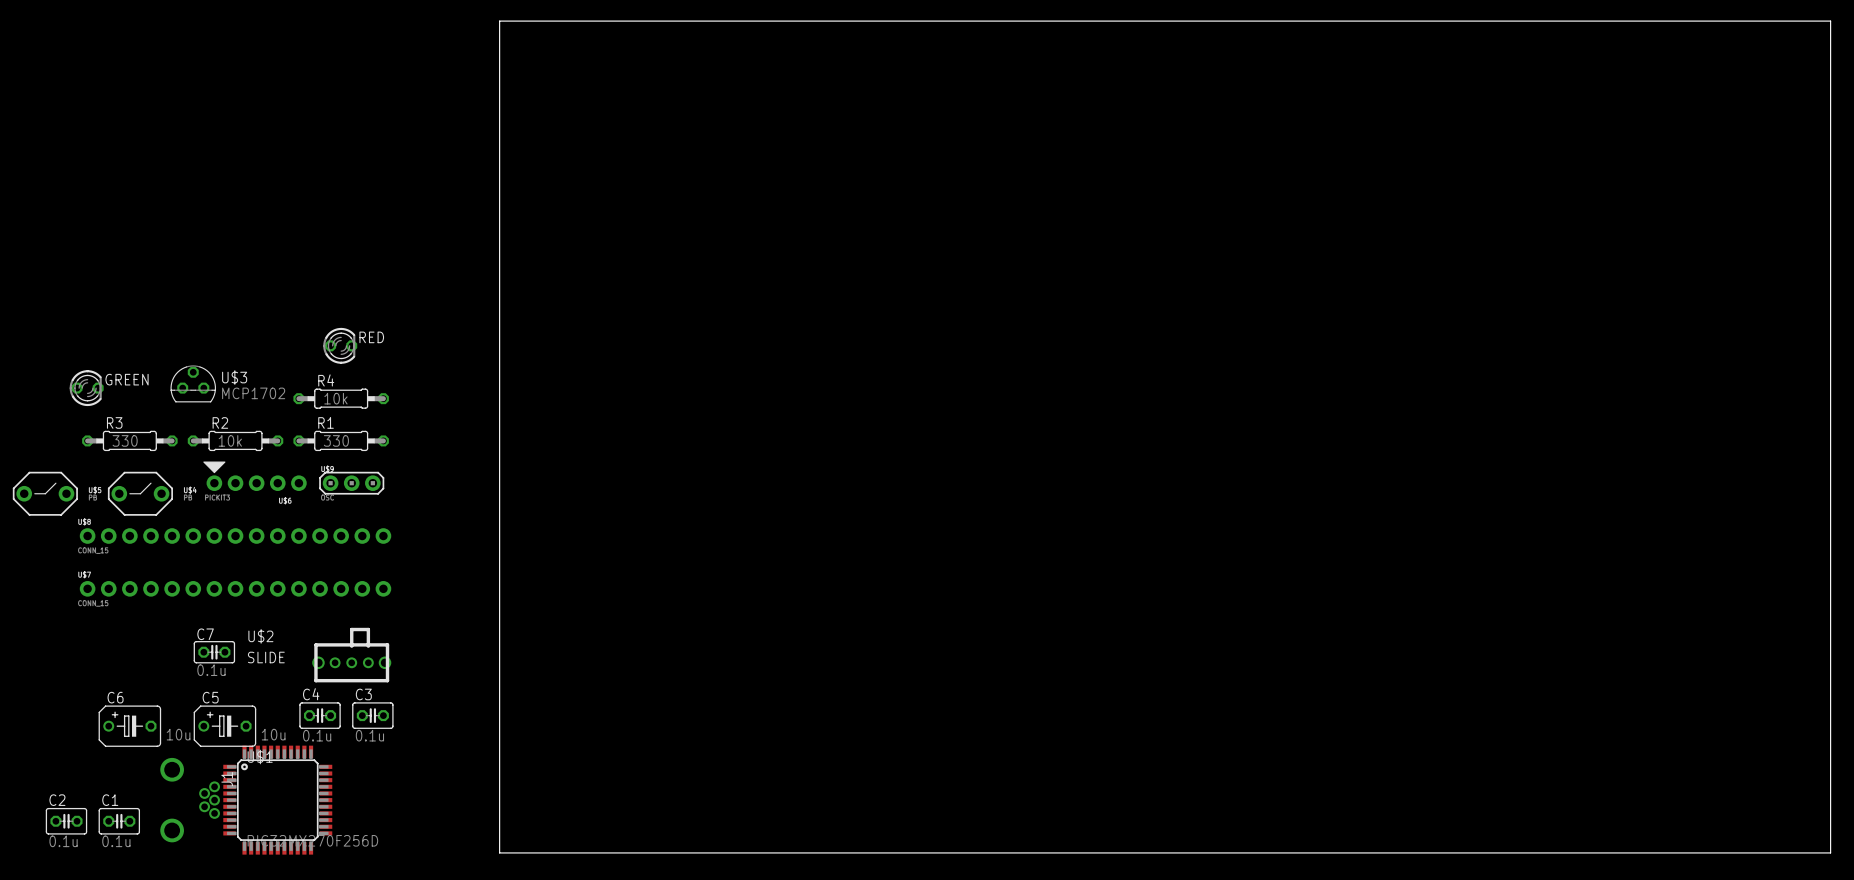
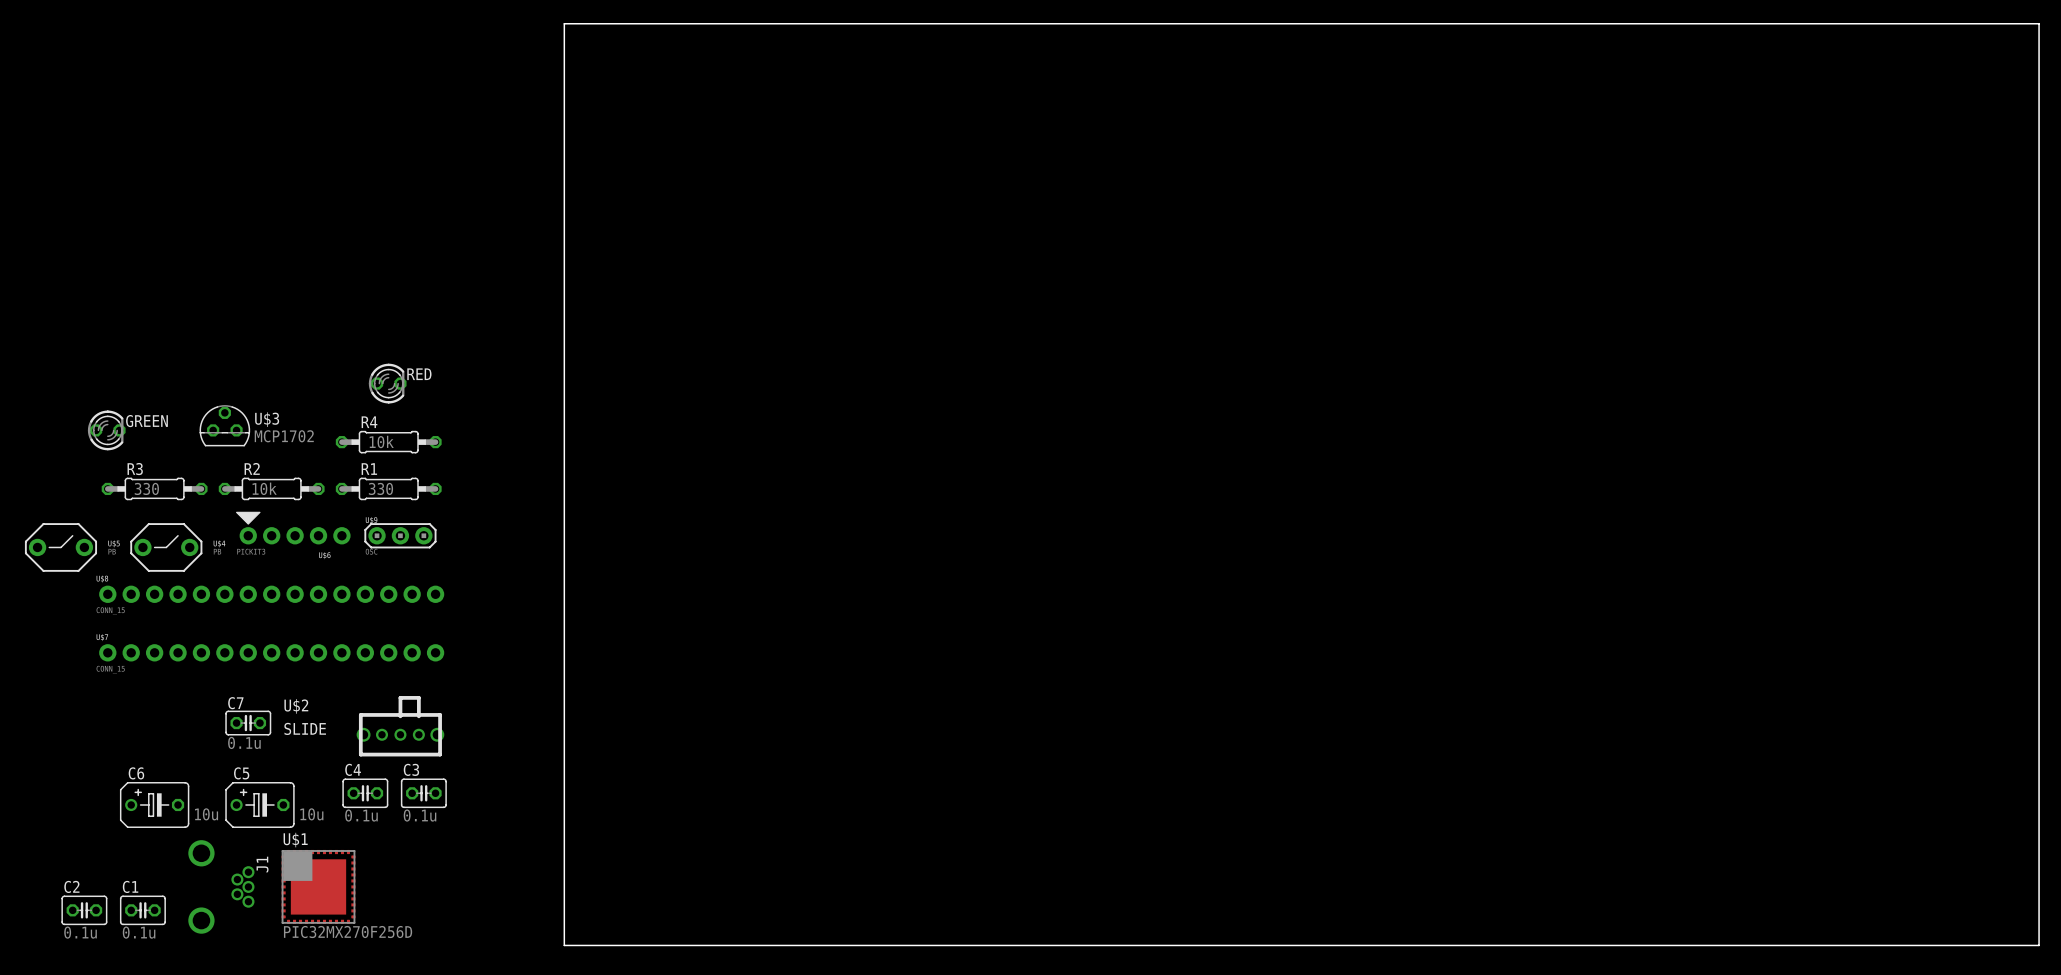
U$1 footprint: [223, 745, 333, 855] -> [281, 849, 356, 924]

